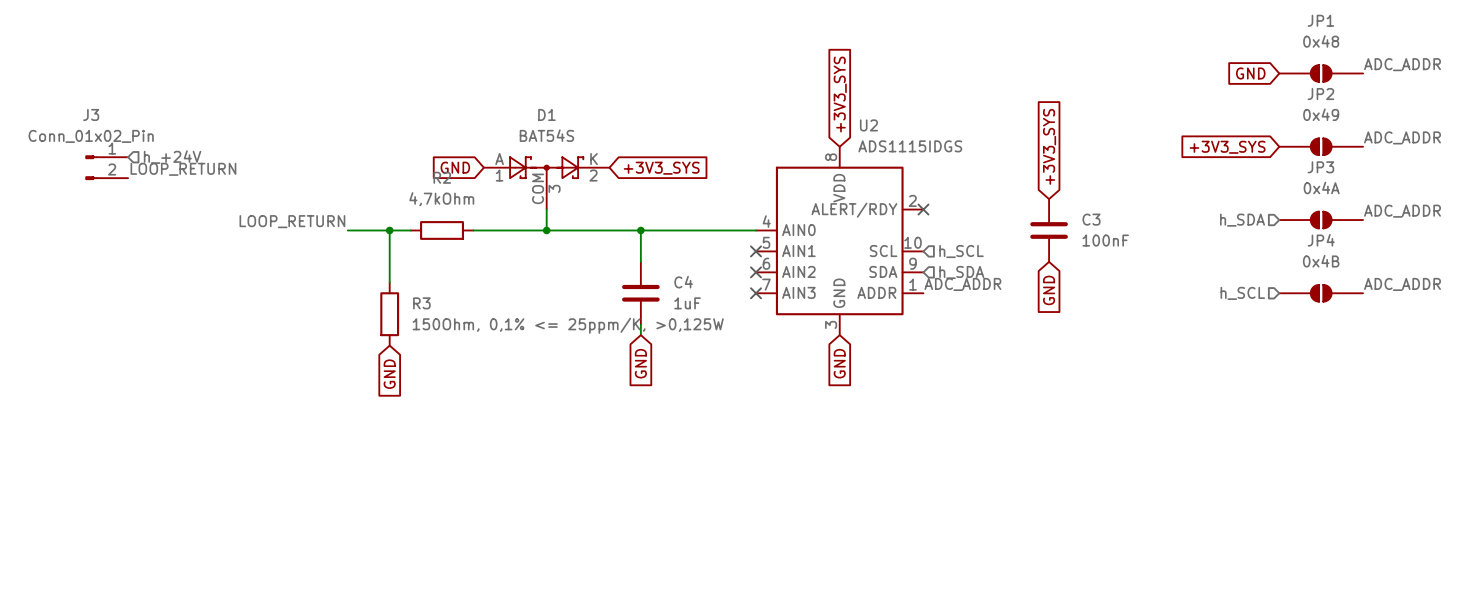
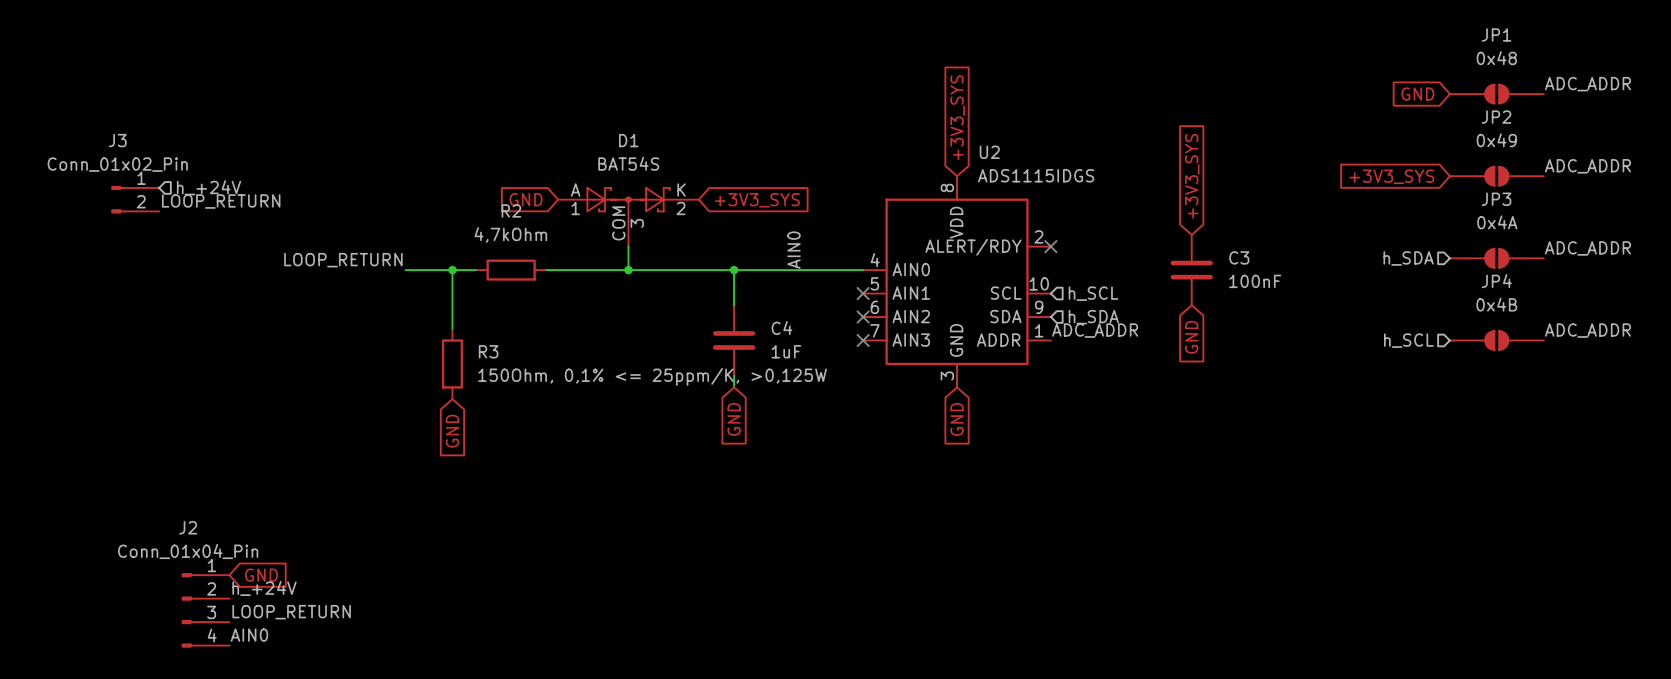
label: none -> AIN0 (794, 250)
global label: none -> GND (261, 575)
label: none -> h_+24V (264, 588)
J2: none -> Conn_01x04_Pin (205, 610)
label: none -> LOOP_RETURN (291, 612)
label: none -> AIN0 (249, 635)

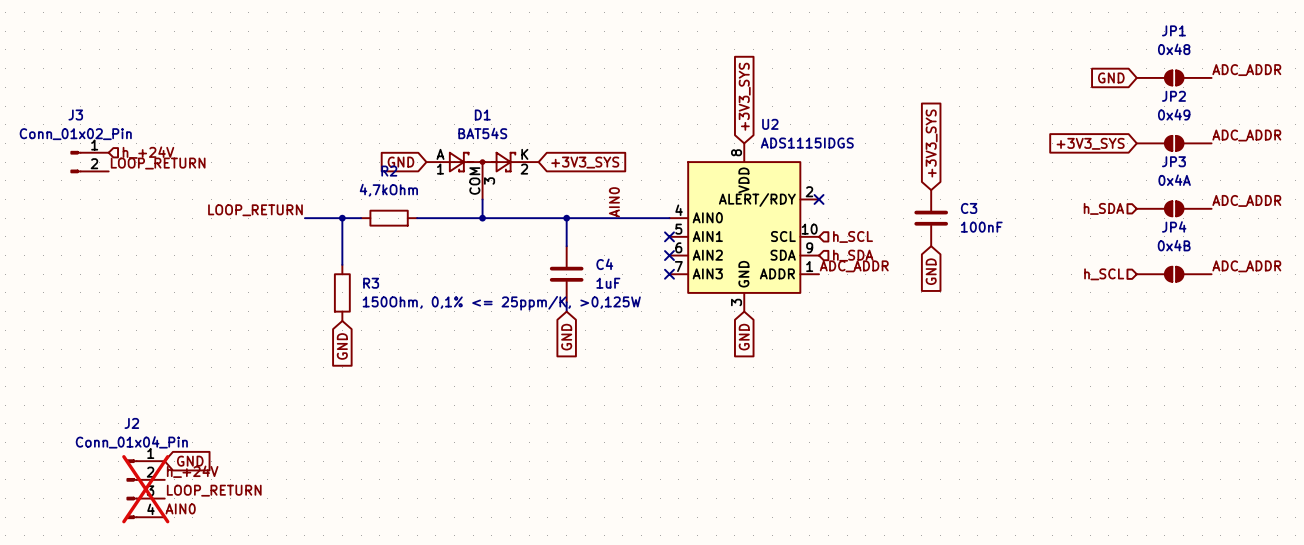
J2 do-not-place cross: none -> (145, 489)

